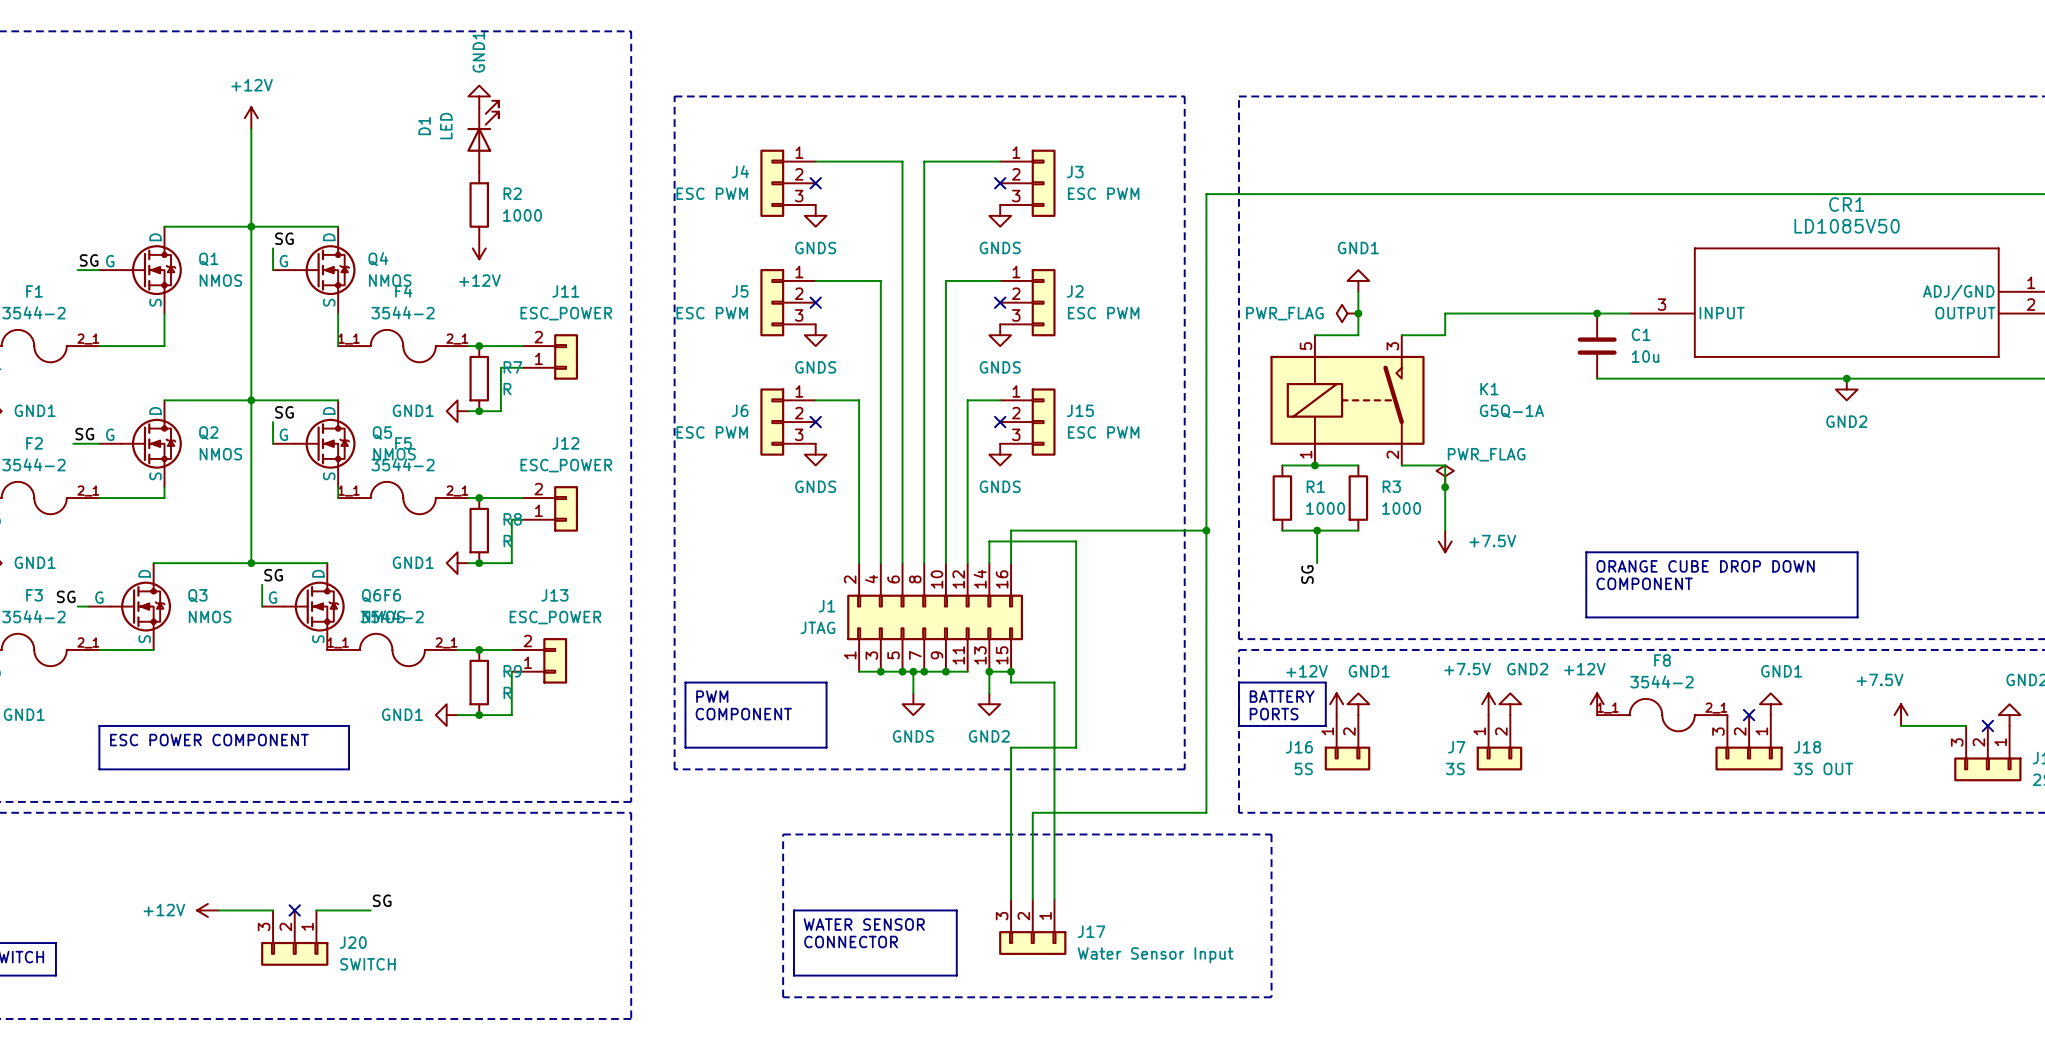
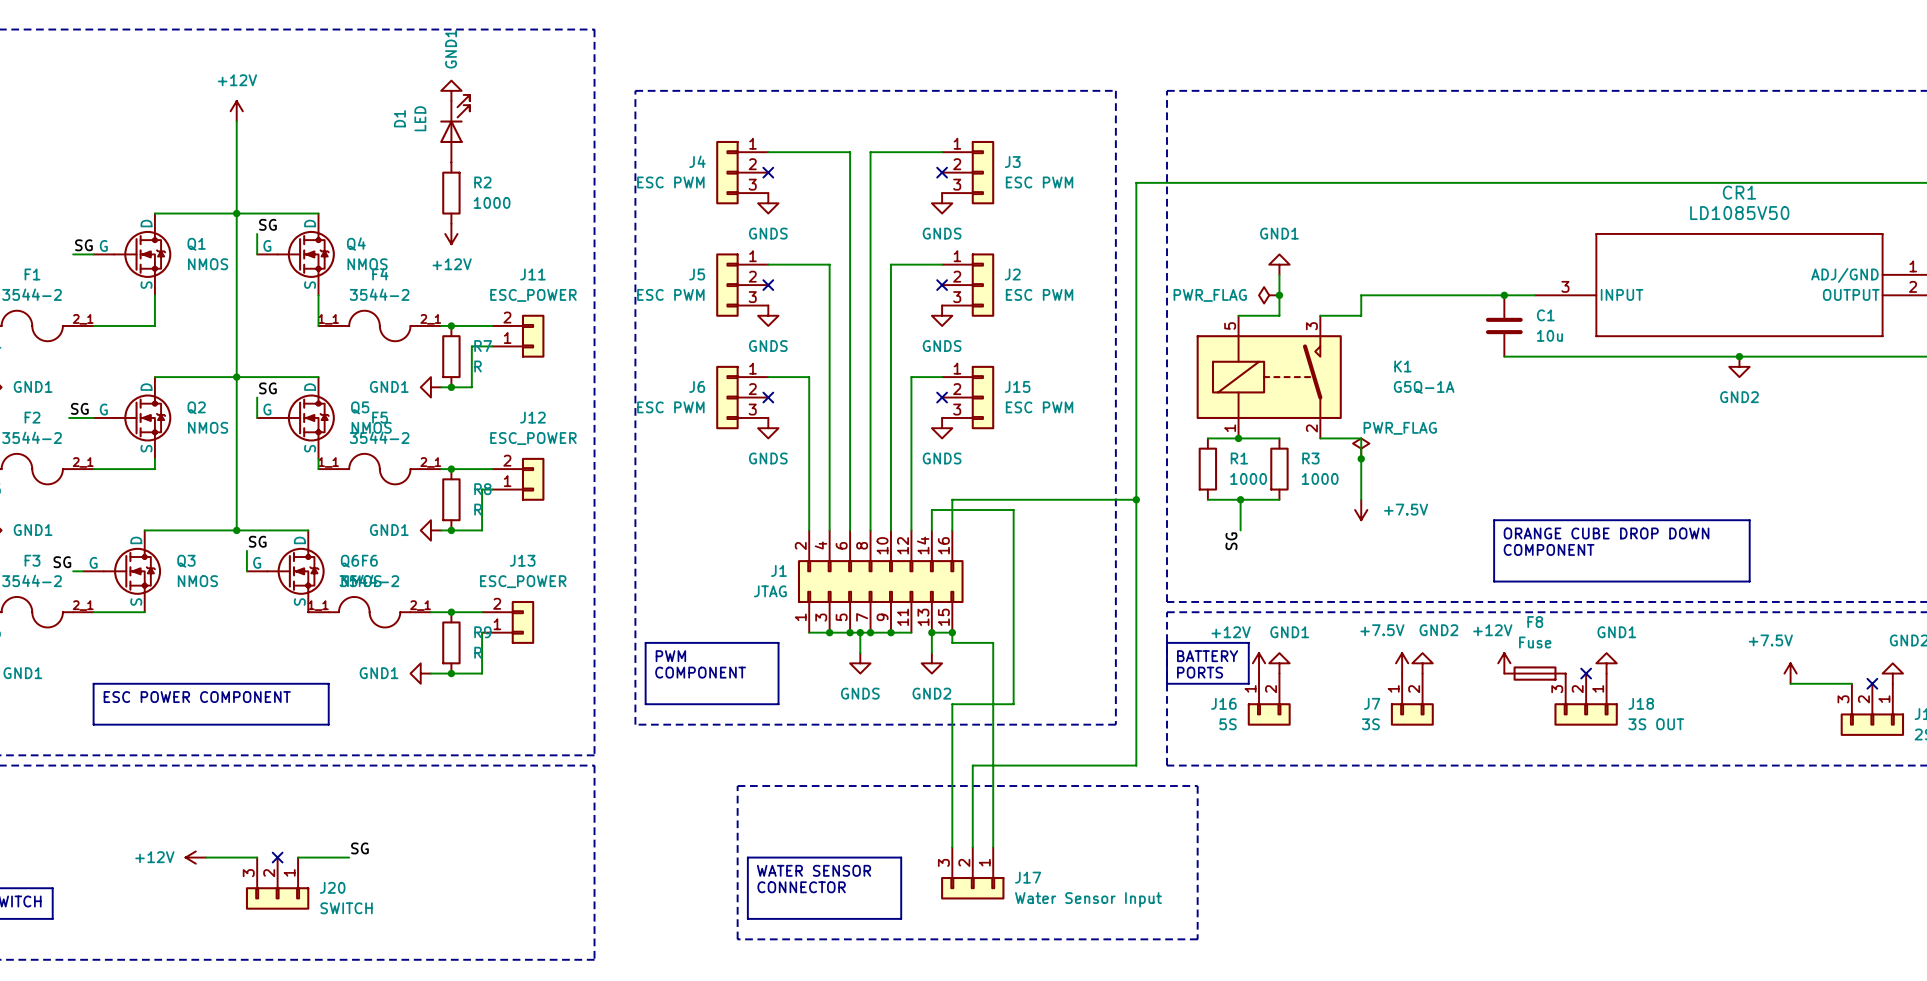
F8 value: 3544-2 (1662, 681) -> Fuse (1535, 642)
F8 symbol: [1597, 698, 1728, 732] -> [1504, 666, 1566, 681]
power symbol position: GND1 (1770, 704) -> GND1 (1606, 663)
no-connect mark: none -> (1586, 673)
no-connect mark: (1749, 715) -> none
J18 position: (1749, 742) -> (1586, 699)

